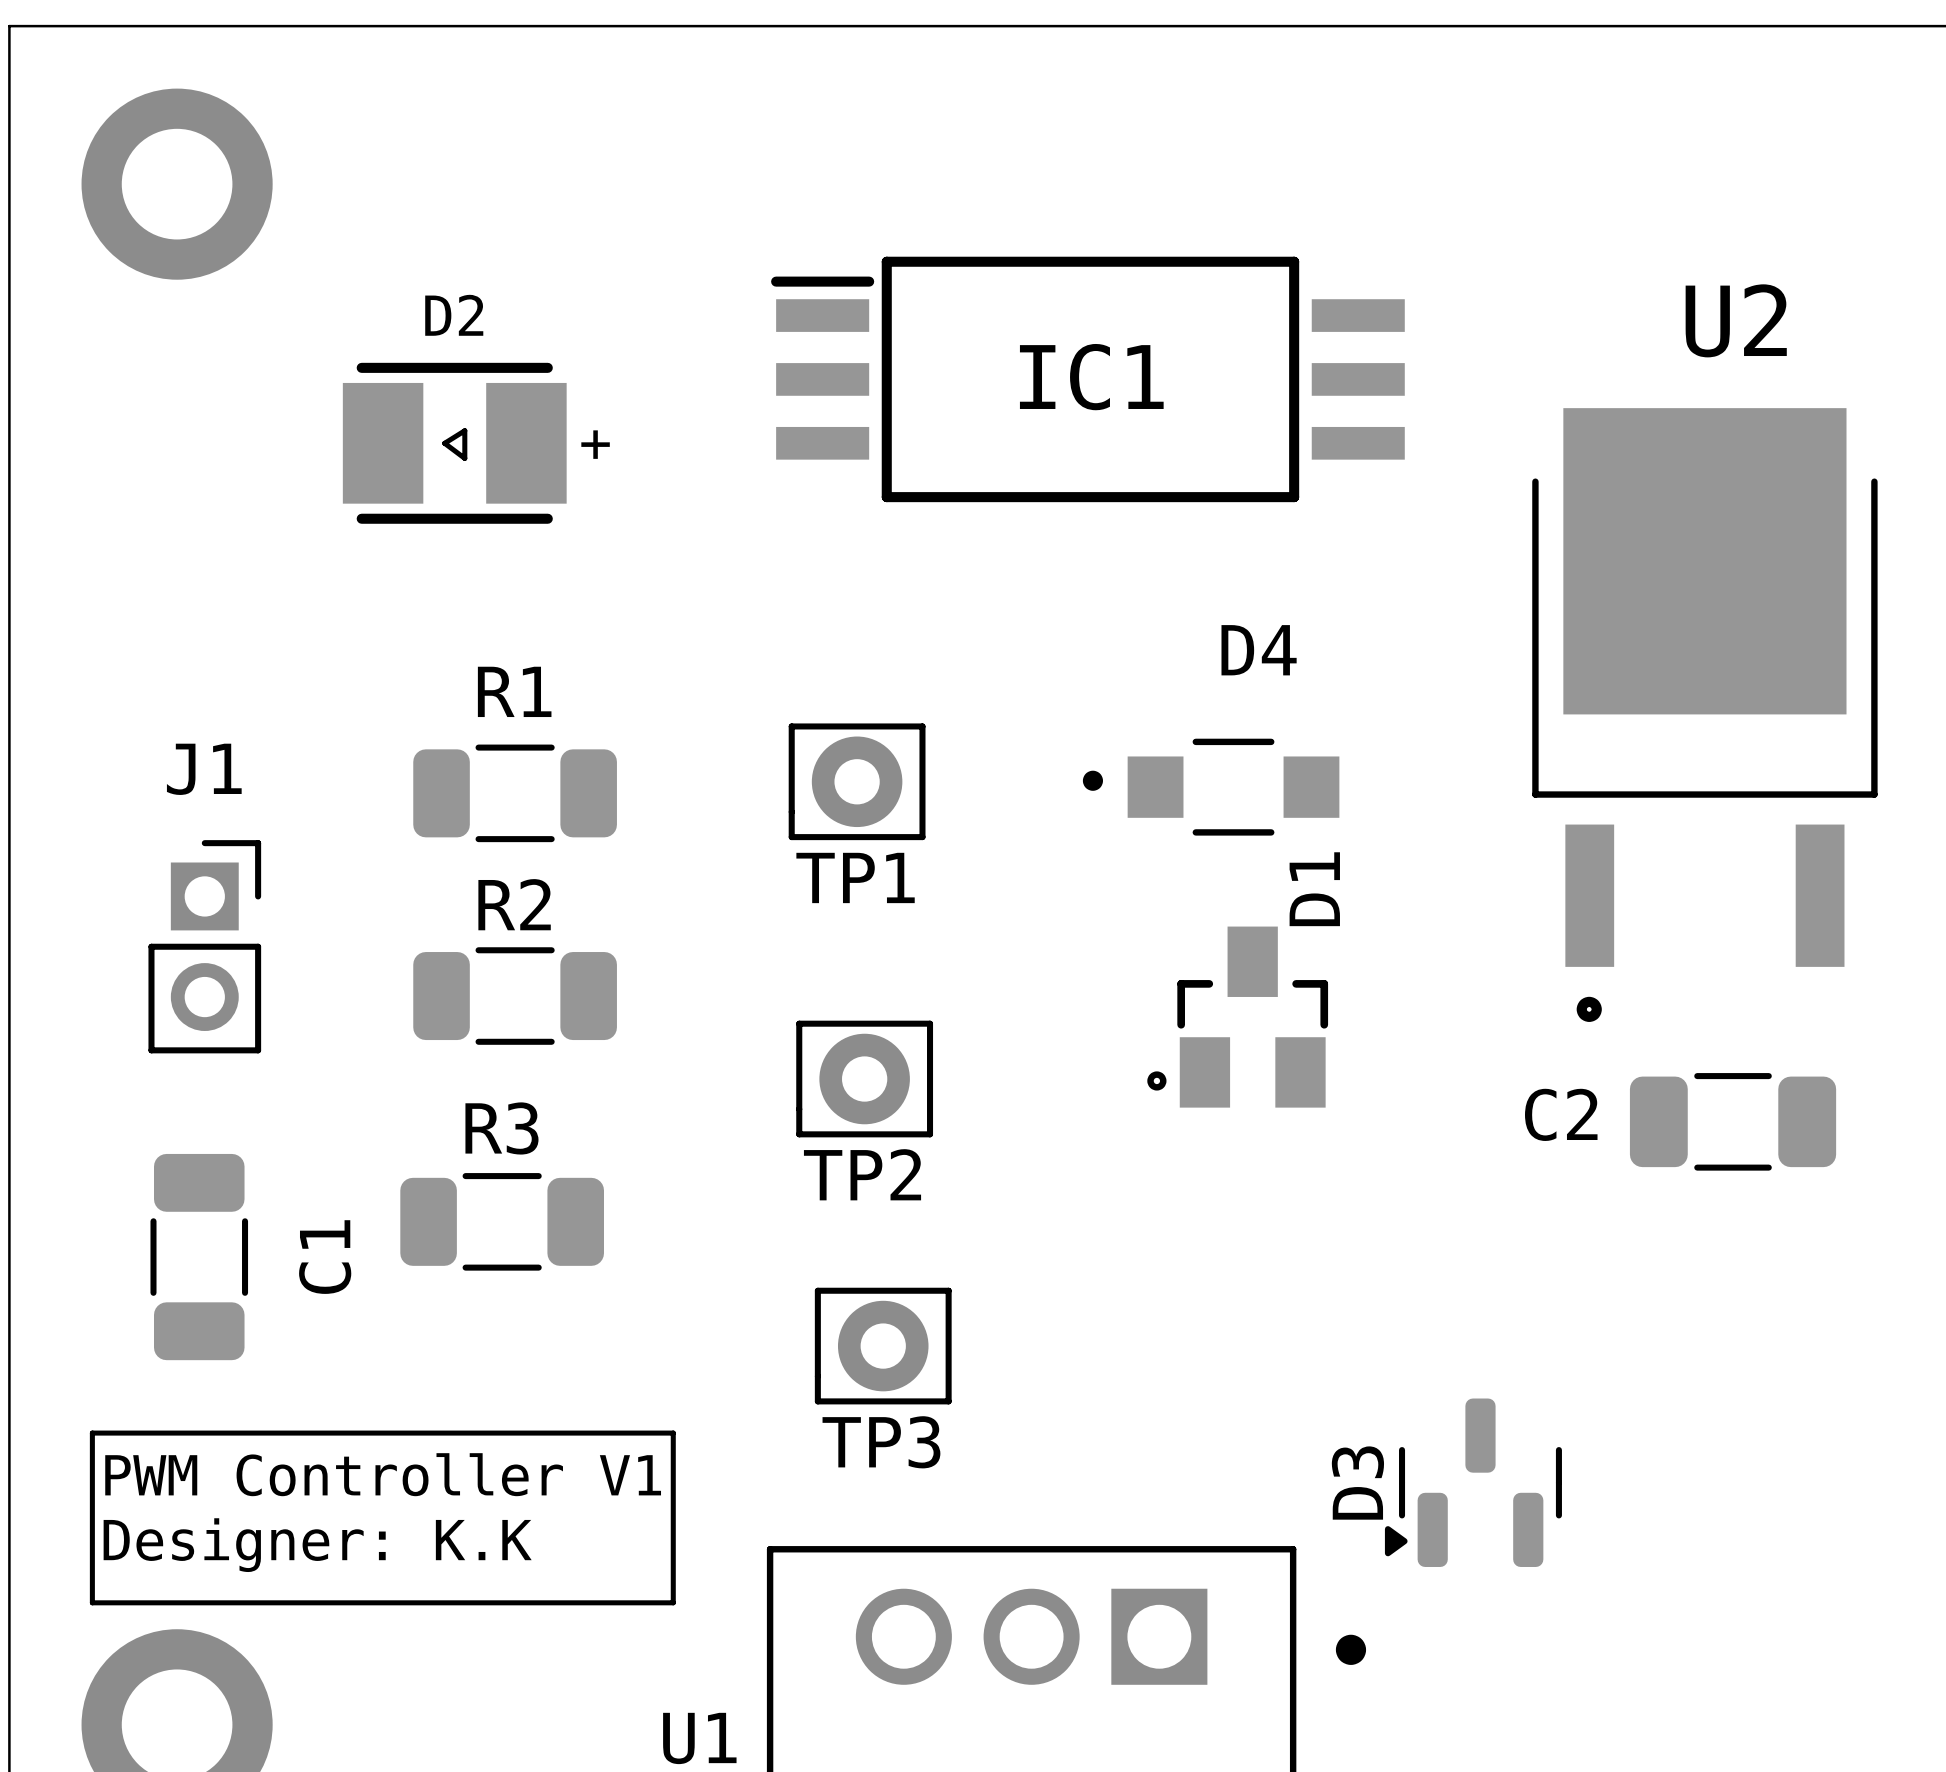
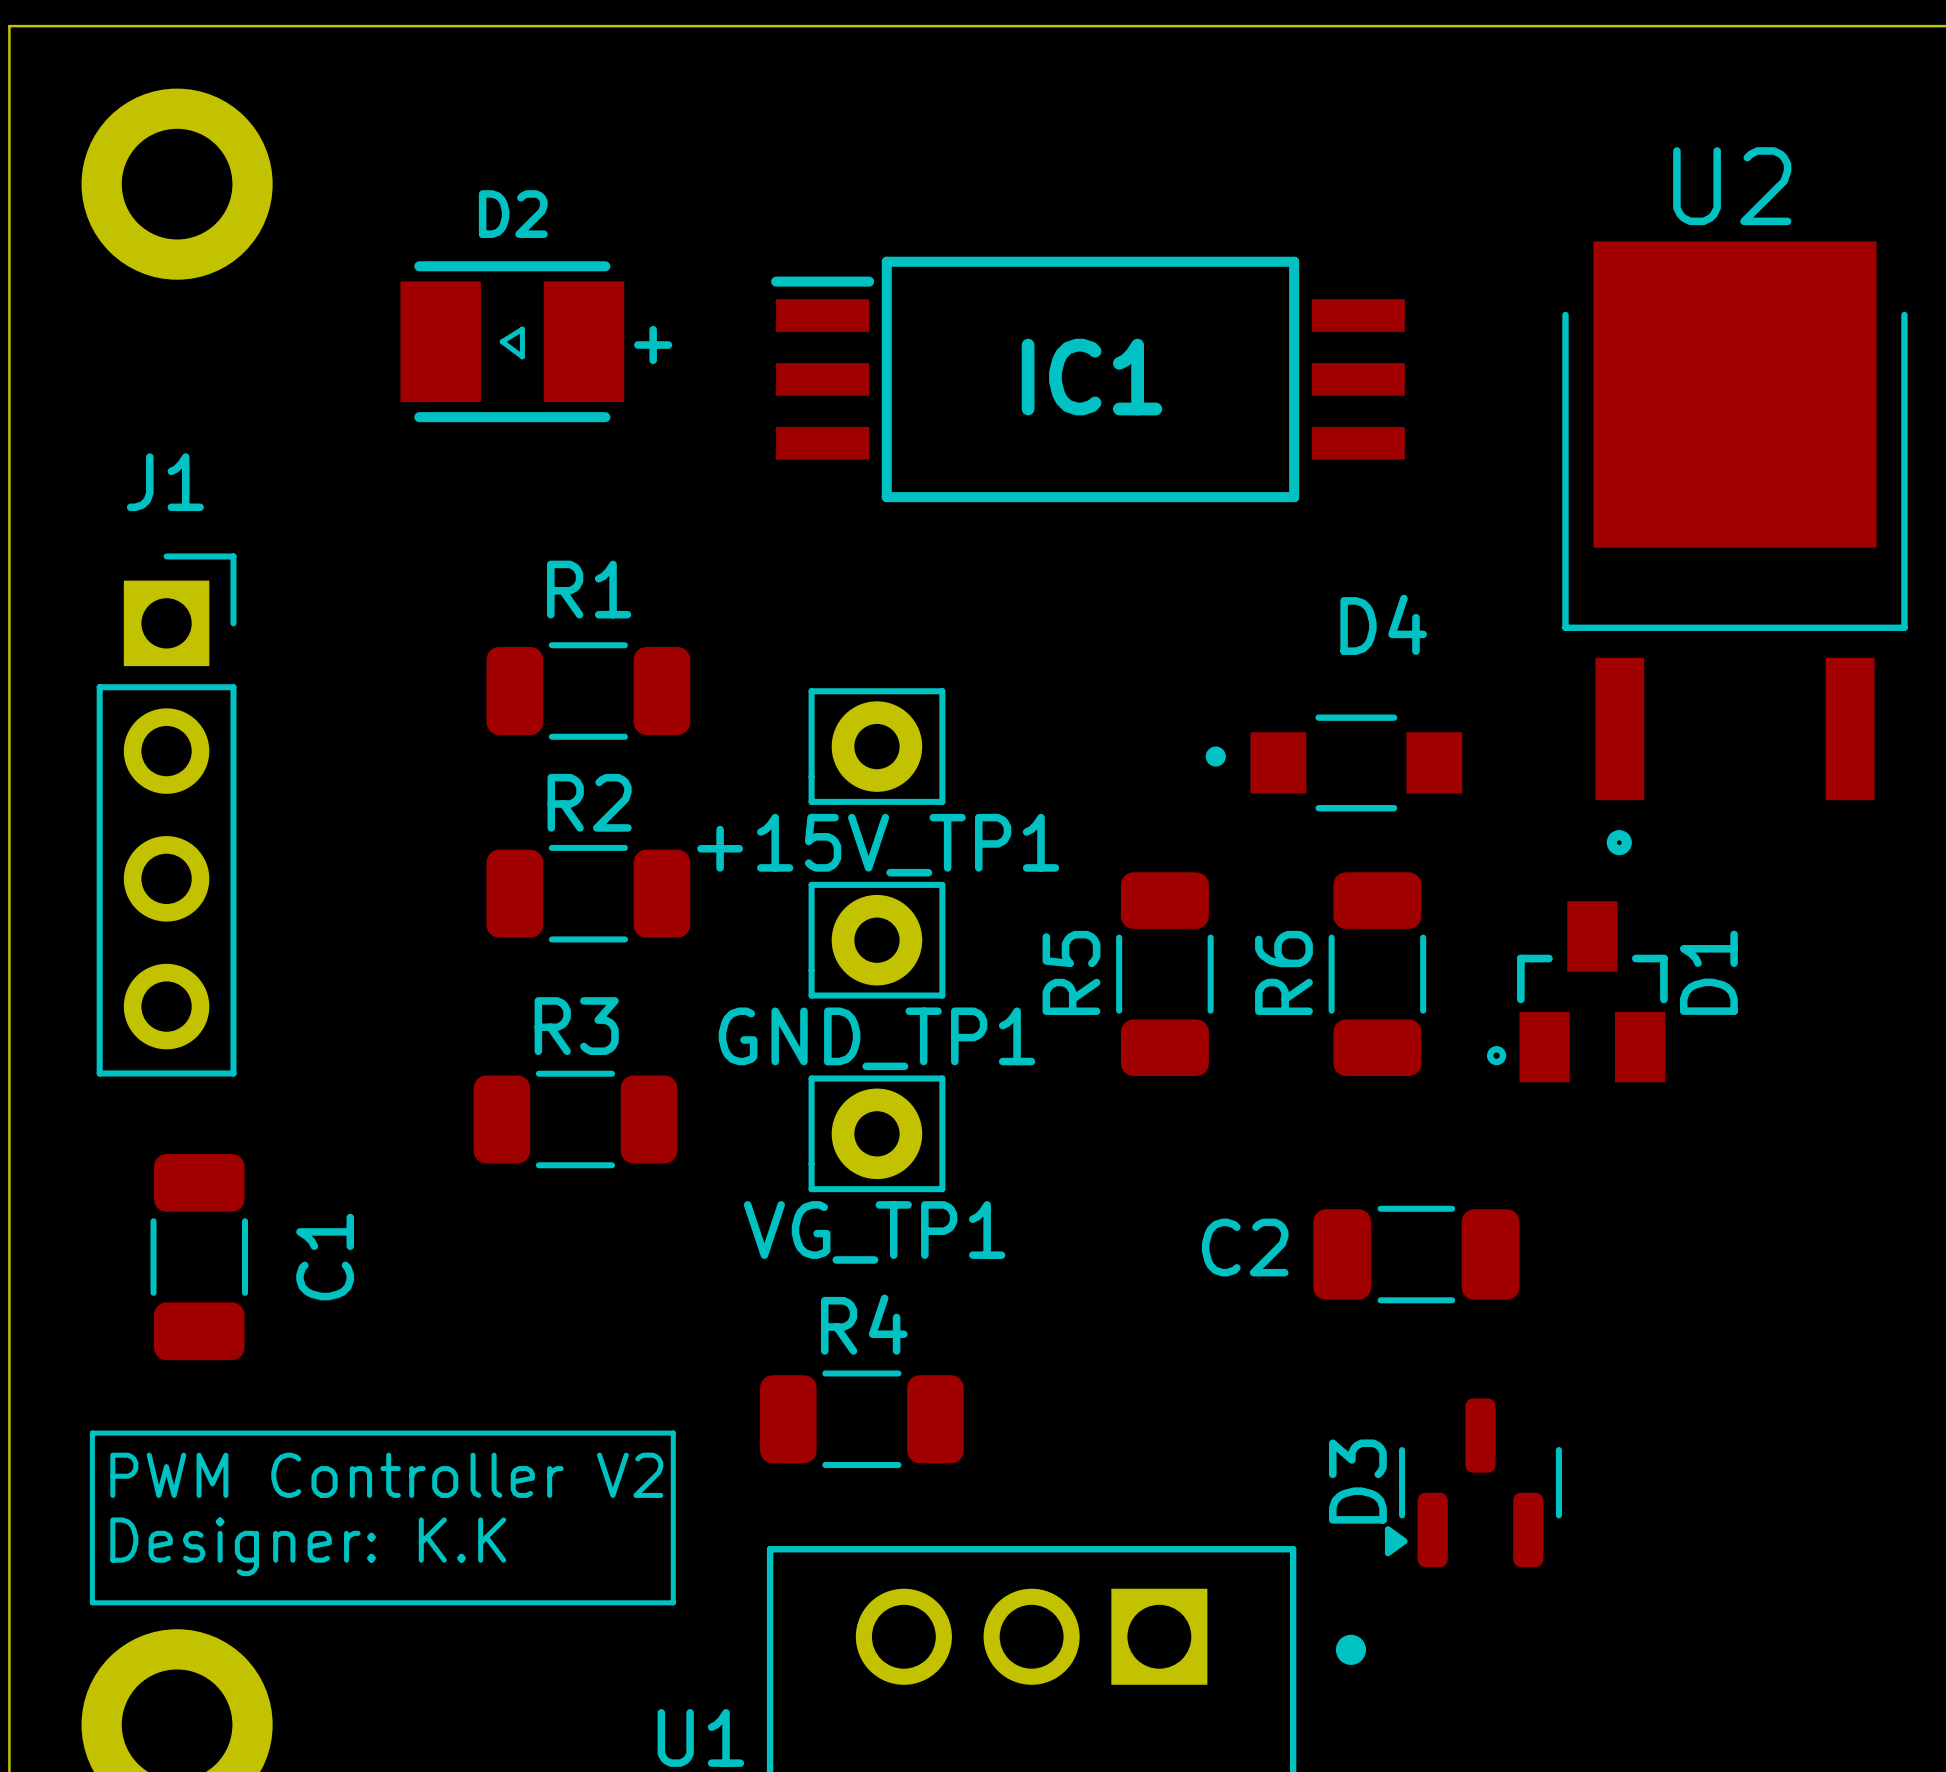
U2 name position: U2 (1736, 320) -> U2 (1732, 186)
D2 position: (454, 443) -> (512, 341)
U2 position: (1704, 715) -> (1734, 548)
J1 name position: J1 (204, 769) -> J1 (165, 482)
TP1 position: (857, 781) -> (876, 746)
D4 position: (1211, 787) -> (1333, 762)
R1 position: (515, 793) -> (588, 691)
J1 footprint: [148, 840, 262, 1054] -> [96, 553, 237, 1077]
TP1 name: TP1 (855, 877) -> +15V_TP1 (878, 845)
D1 name position: D1 (1314, 889) -> D1 (1708, 972)
GND_TP1: none -> (876, 940)
R5: none -> (1164, 974)
R6: none -> (1377, 974)
R2 position: (515, 996) -> (588, 893)
D1 position: (1237, 1017) -> (1577, 991)
TP2: (864, 1079) -> none
C2 position: (1733, 1121) -> (1416, 1254)
VG_TP1: none -> (876, 1133)
R3 position: (502, 1221) -> (575, 1119)
TP3: (883, 1346) -> none
R4: none -> (861, 1419)
text: PWM Controller V1 (383, 1474) -> PWM Controller V2 (386, 1475)

